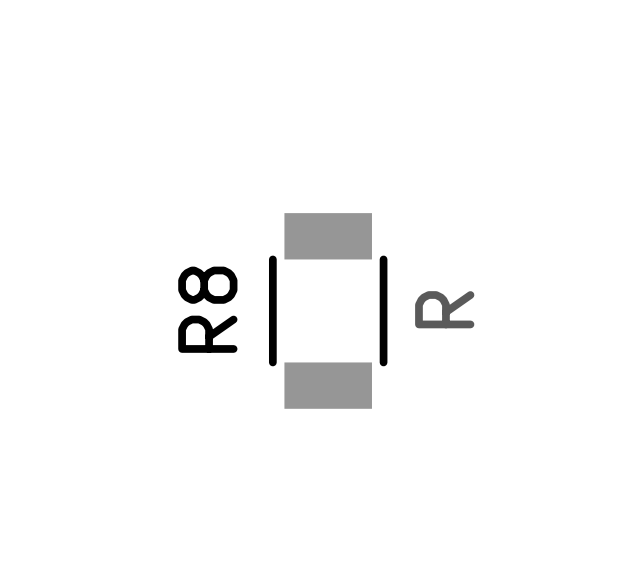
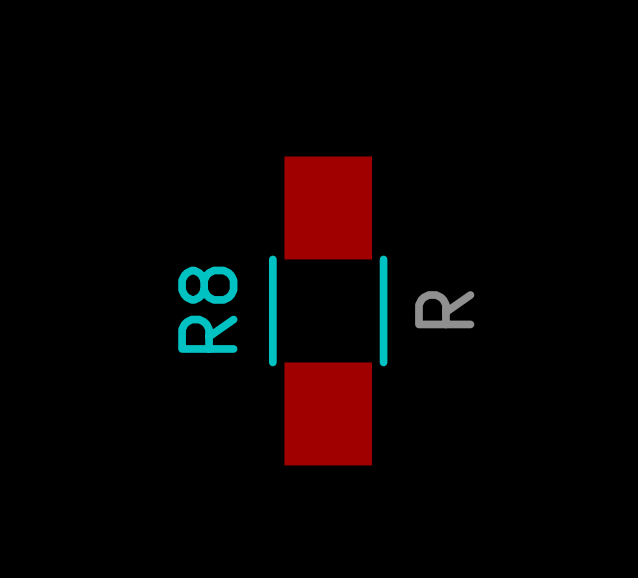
R8 footprint: [268, 213, 388, 409] -> [268, 156, 388, 466]

